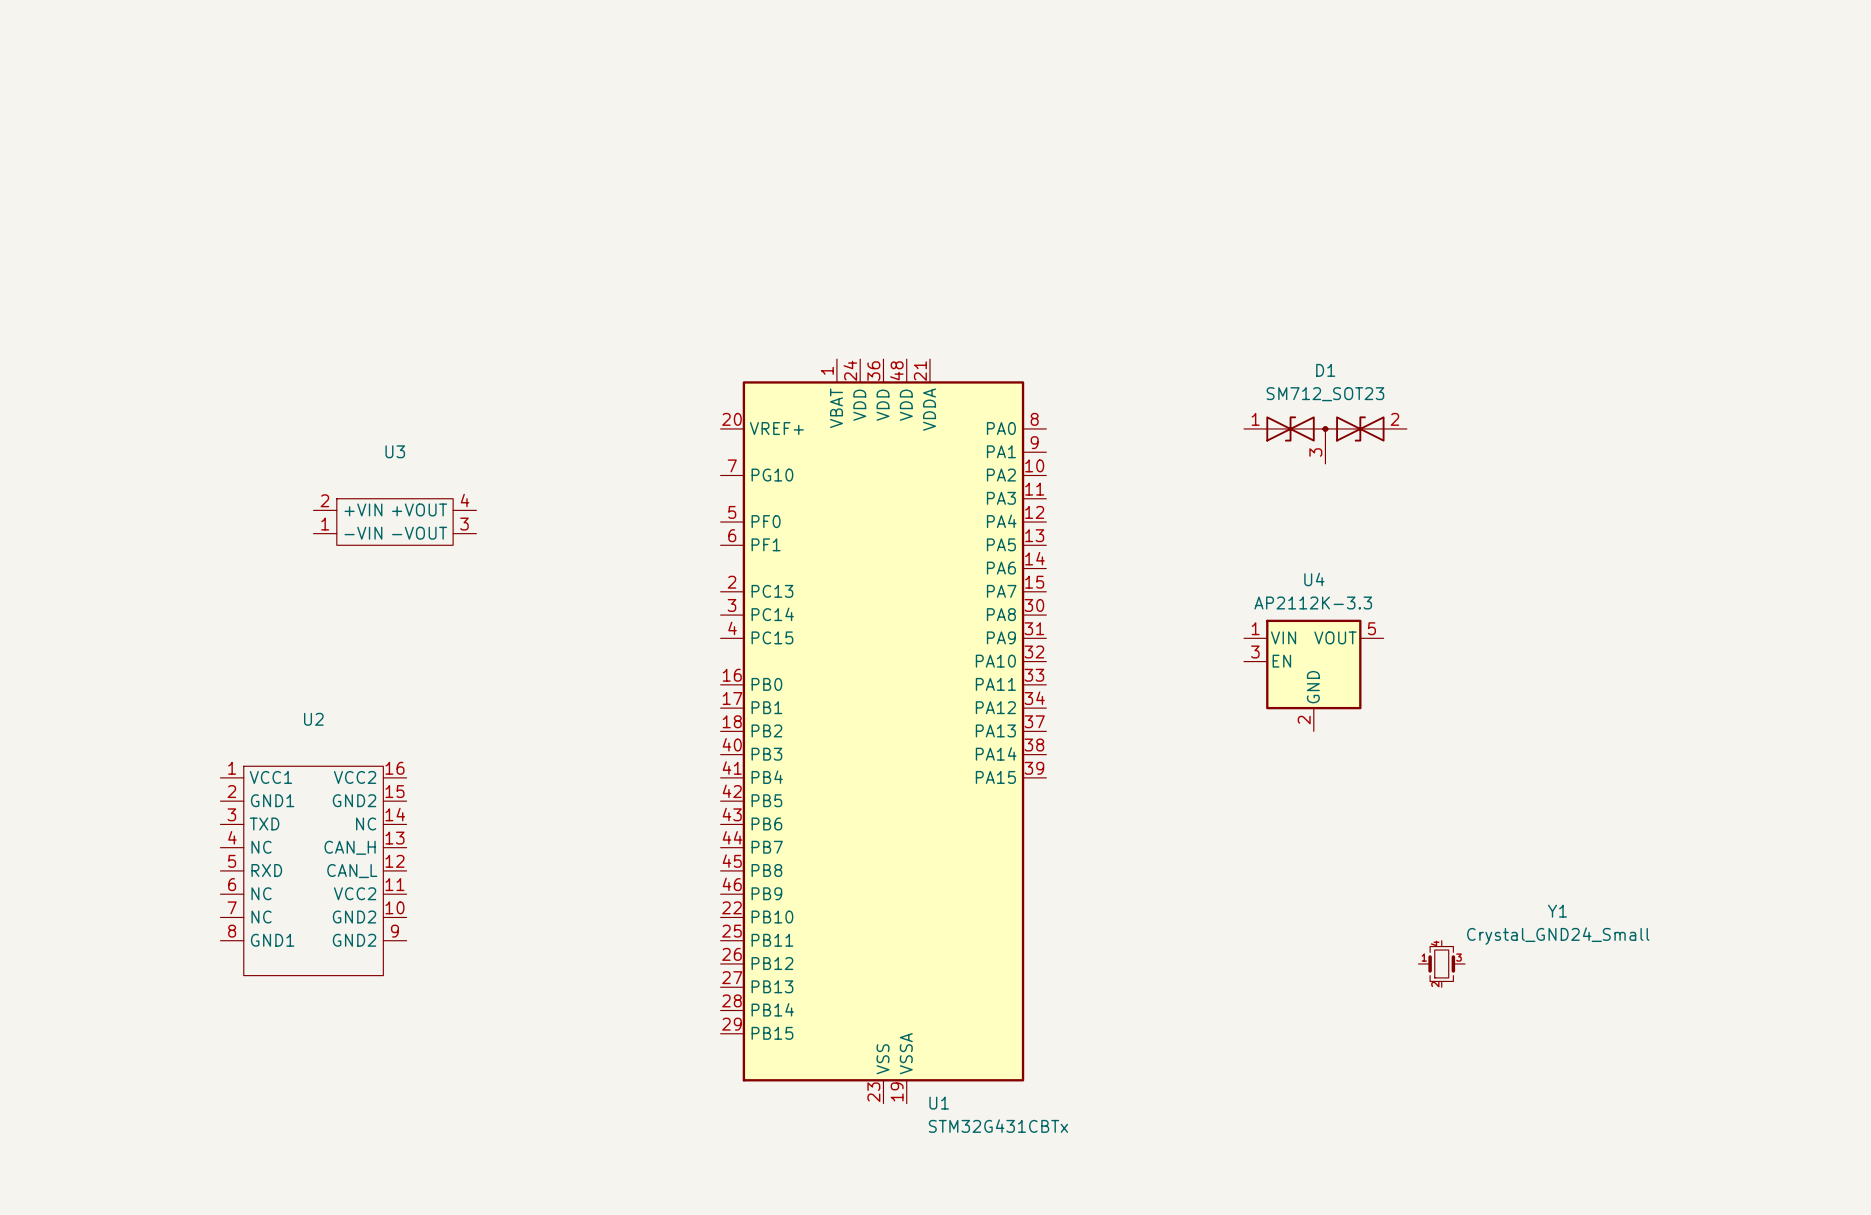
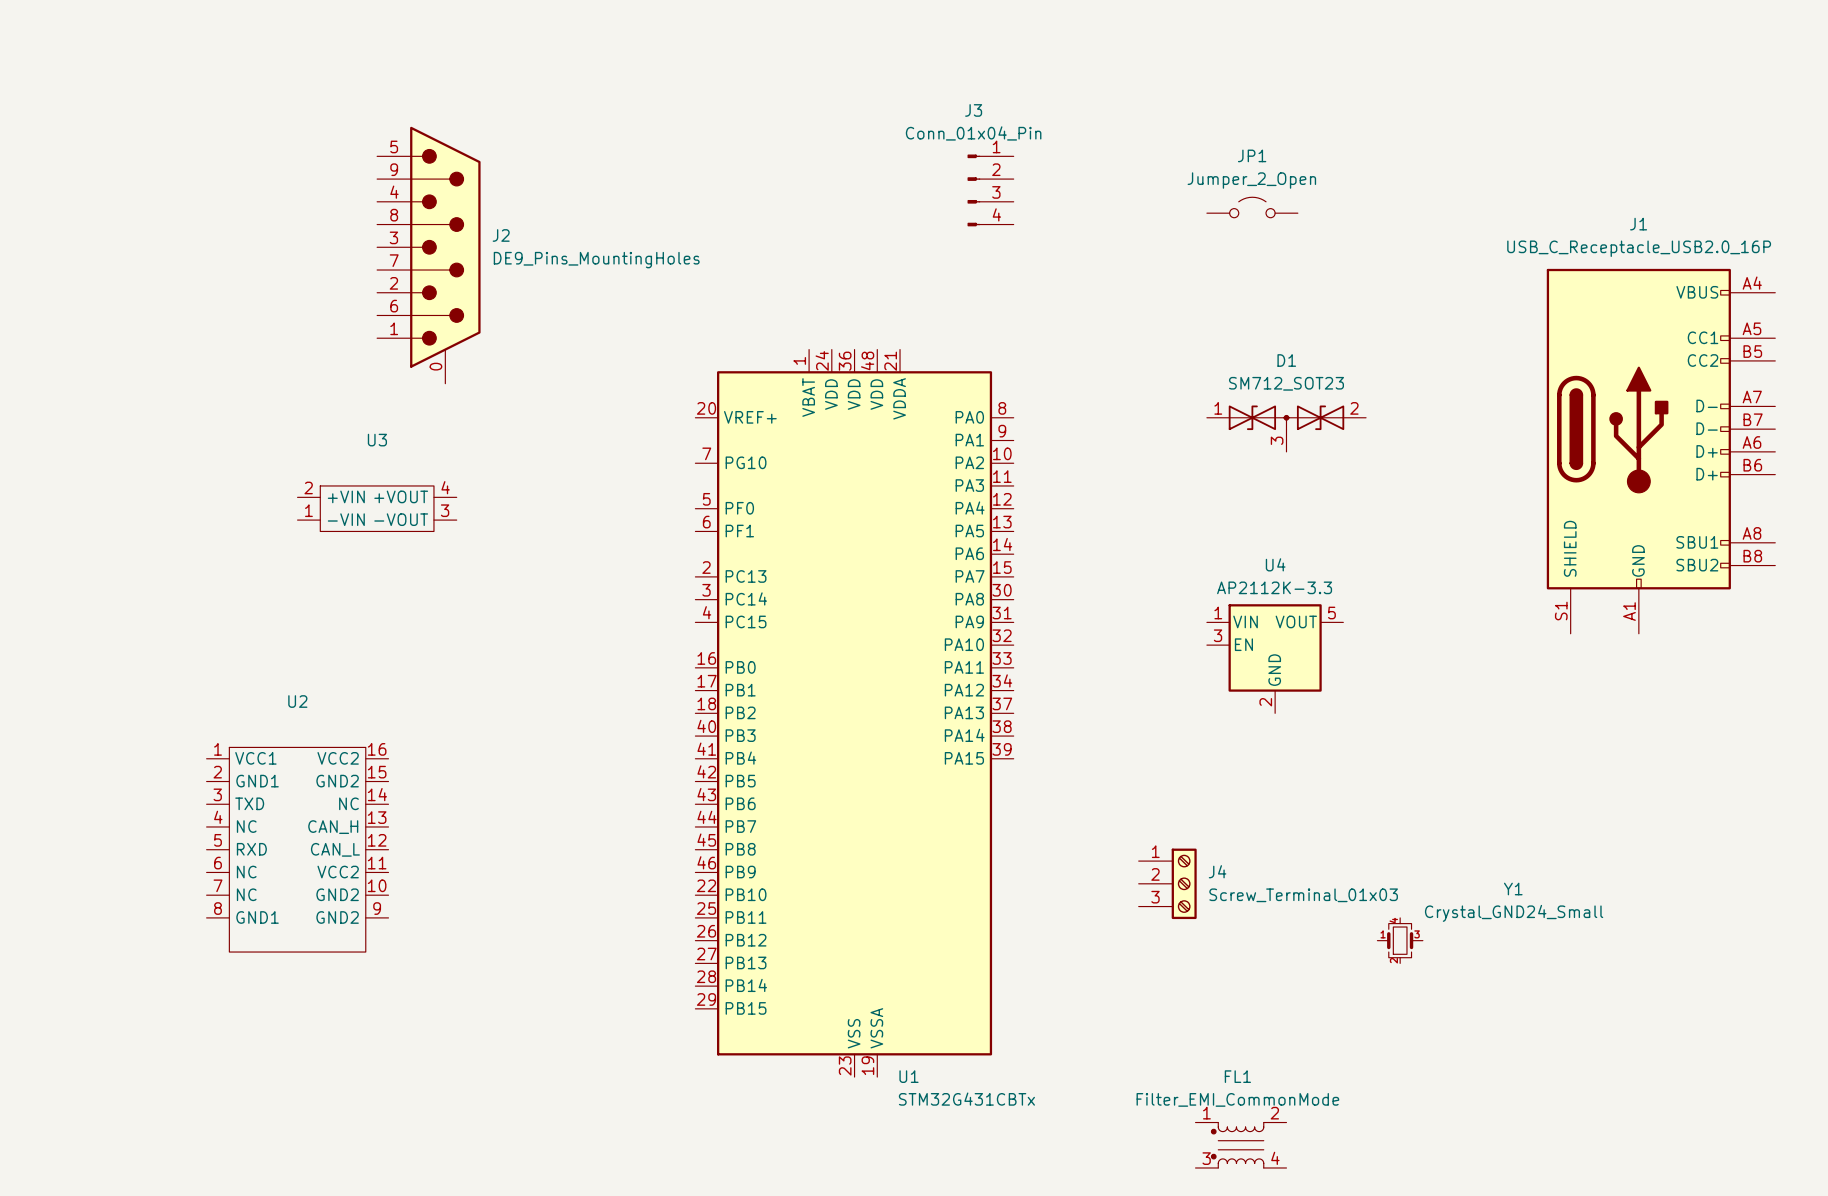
J3: none -> Conn_01x04_Pin (990, 190)
JP1: none -> Jumper_2_Open (1252, 207)
J2: none -> DE9_Pins_MountingHoles (428, 255)
J1: none -> USB_C_Receptacle_USB2.0_16P (1661, 451)
J4: none -> Screw_Terminal_01x03 (1167, 883)
FL1: none -> Filter_EMI_CommonMode (1241, 1145)

